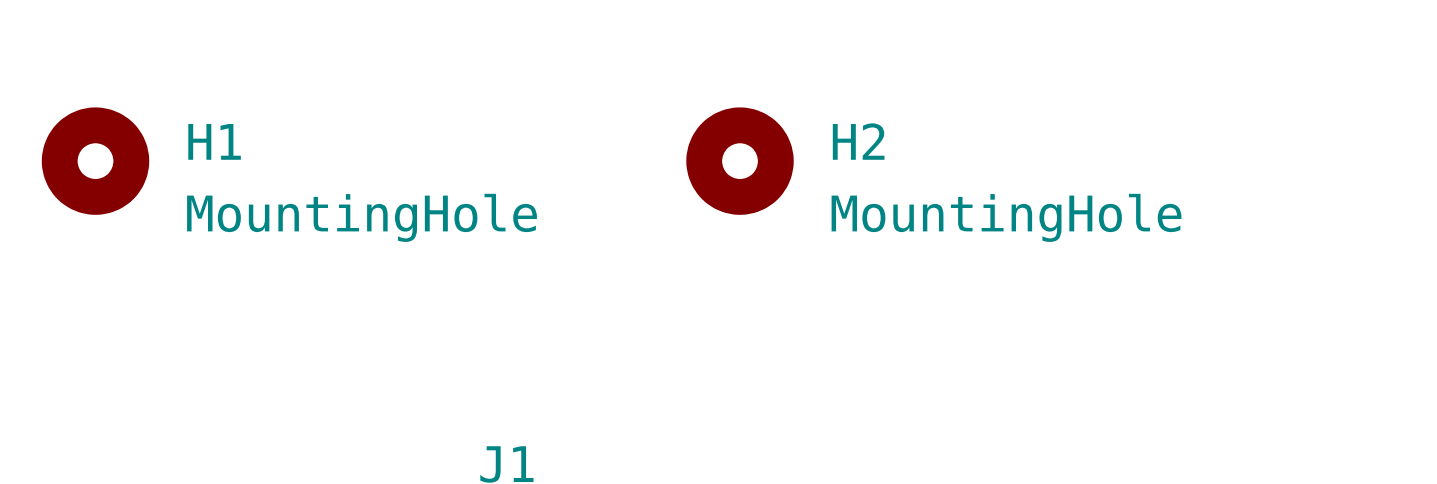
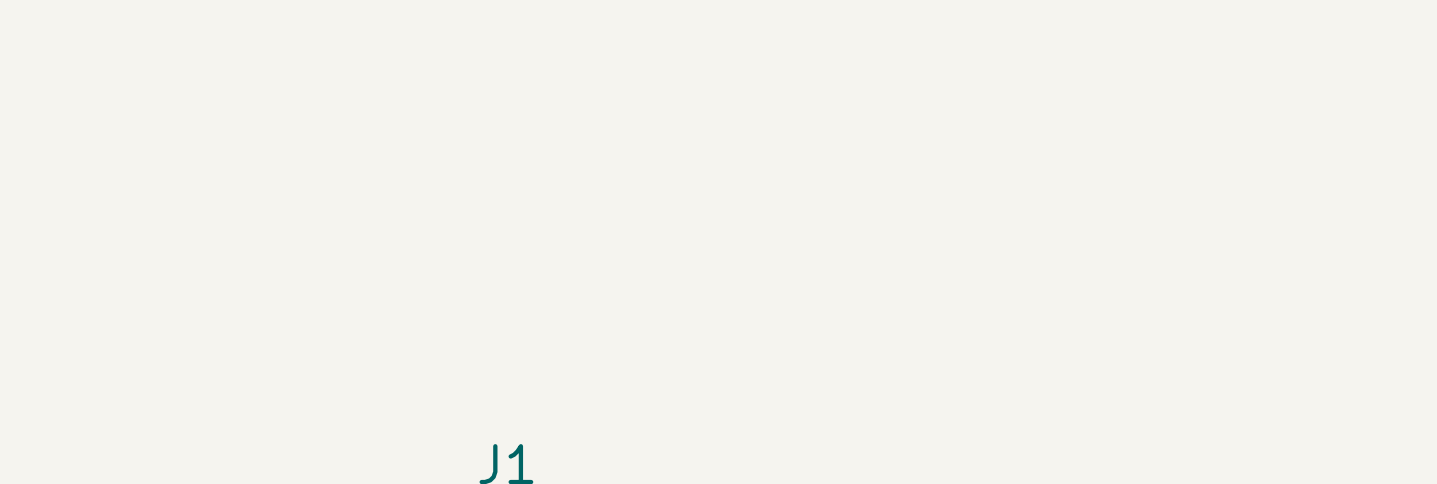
H1: MountingHole (95, 161) -> none
H2: MountingHole (740, 161) -> none

